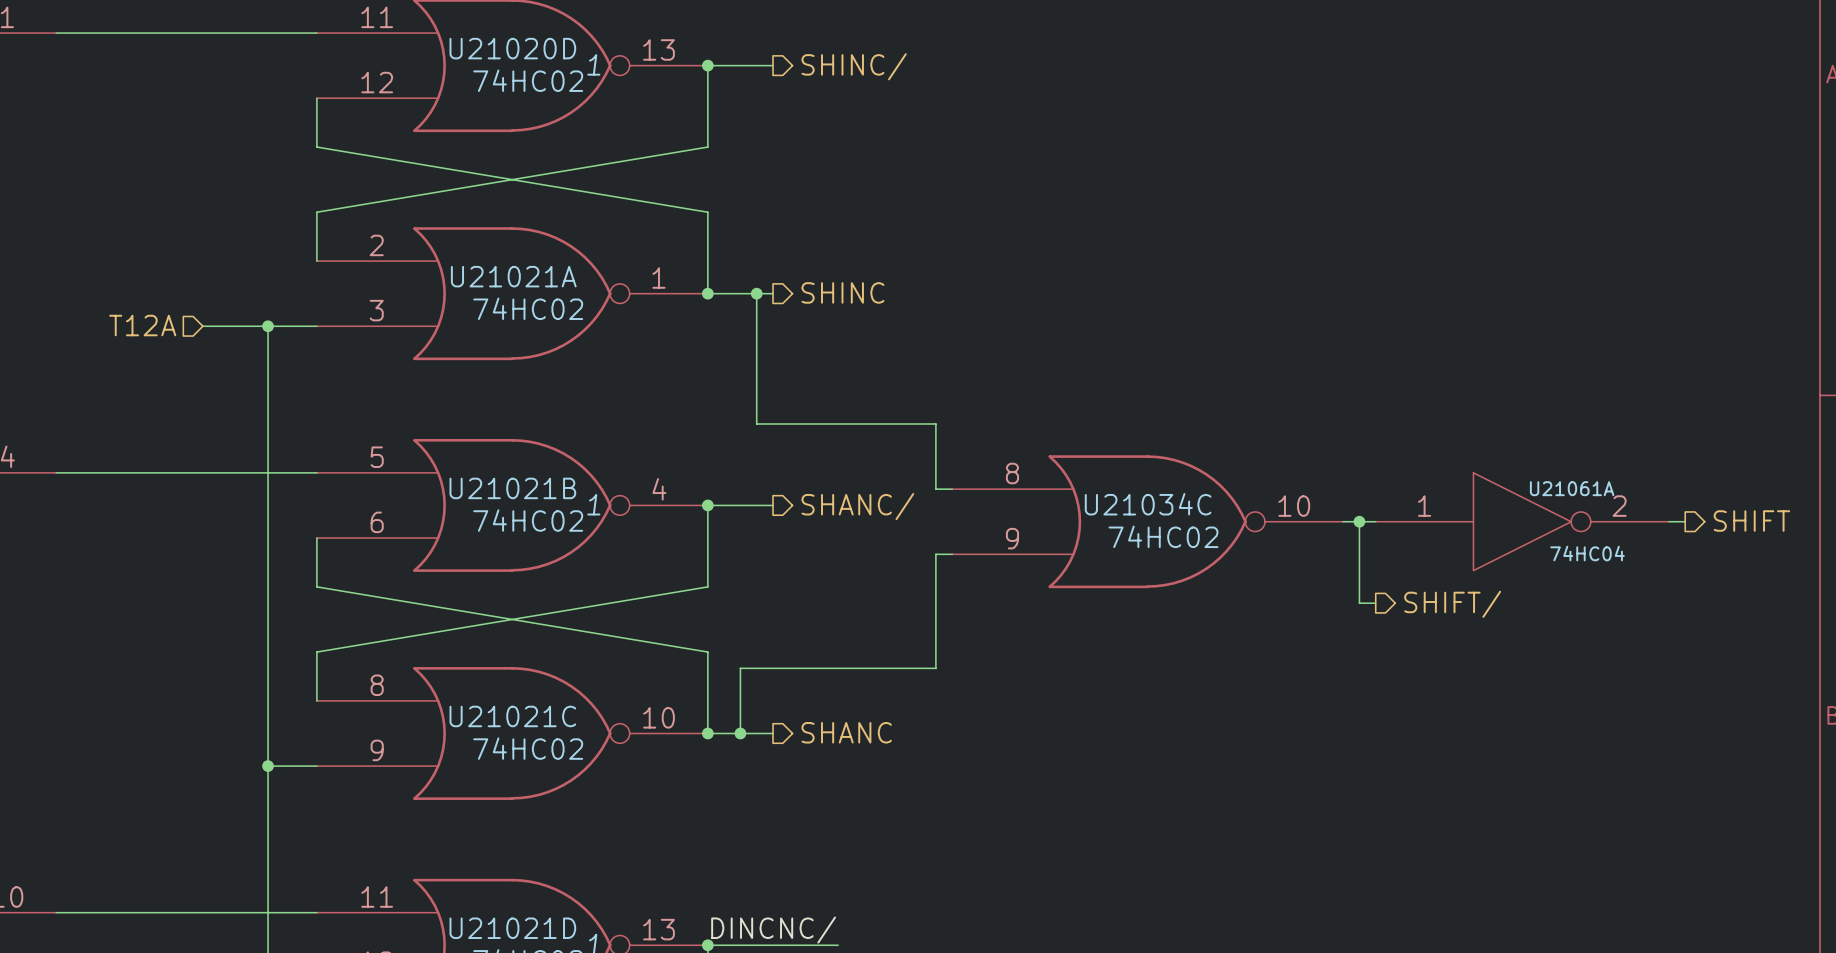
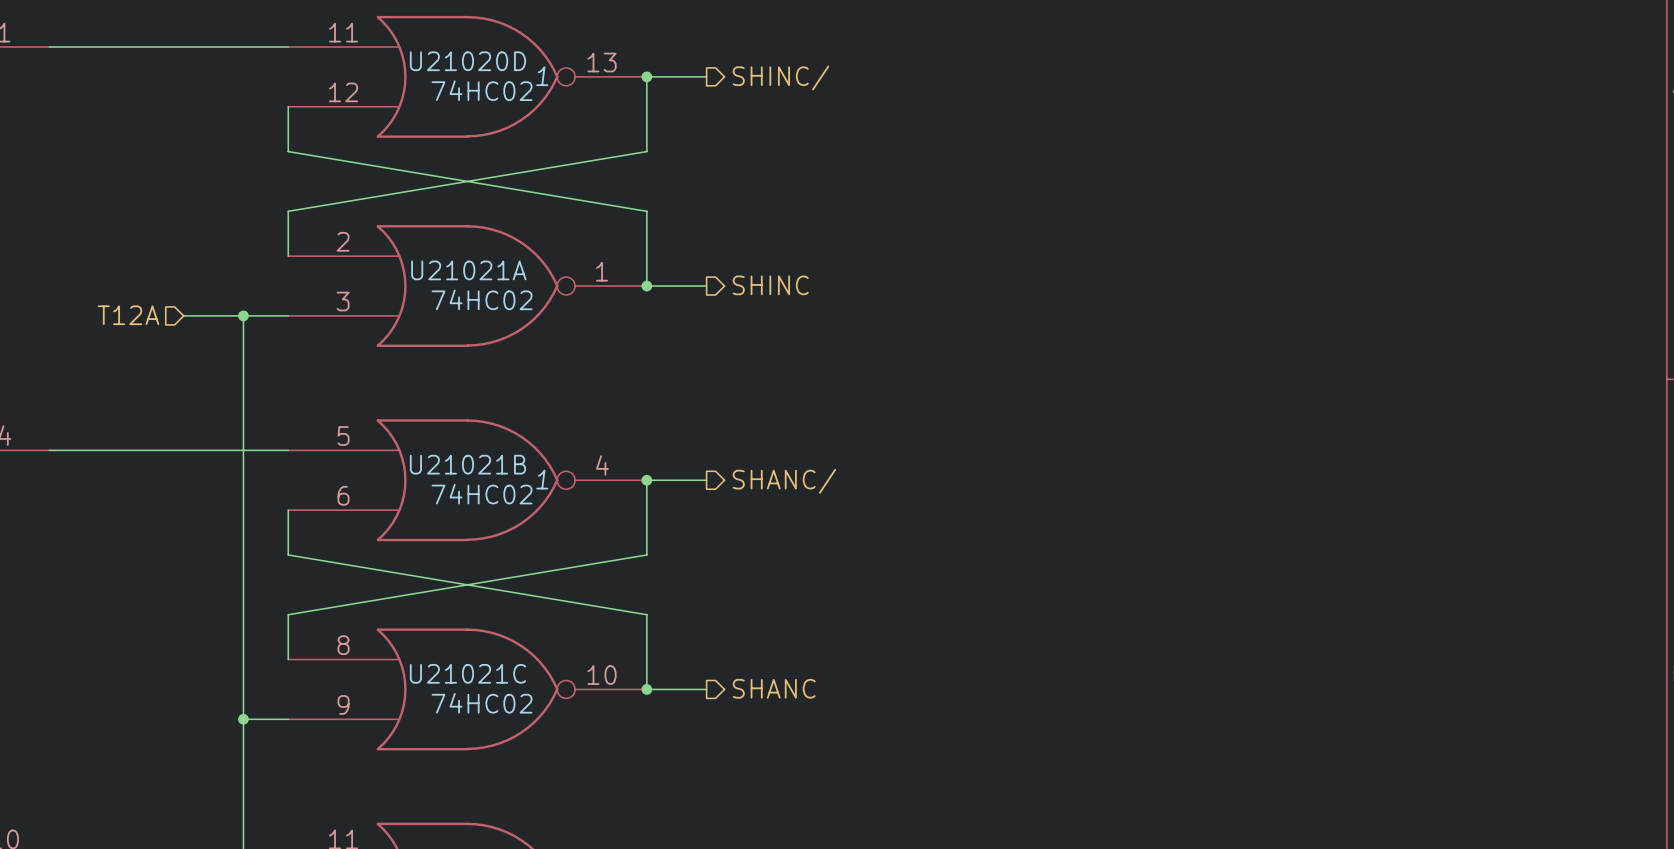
wire: (756, 293) (756, 424) (935, 424) (935, 489) (952, 489) -> none
junction: (756, 293) -> none
U21034C: 74HC02 (1147, 521) -> none
wire: (1343, 521) (1375, 521) -> none
wire: (1359, 521) (1359, 603) (1375, 603) -> none
junction: (1359, 521) -> none
U21061A: 74HC04 (1522, 521) -> none
wire: (1668, 521) (1685, 521) -> none
hierarchical label: SHIFT (1751, 521) -> none
wire: (952, 554) (935, 554) (935, 668) (740, 668) (740, 733) -> none
hierarchical label: SHIFT/ (1452, 604) -> none
junction: (740, 733) -> none

